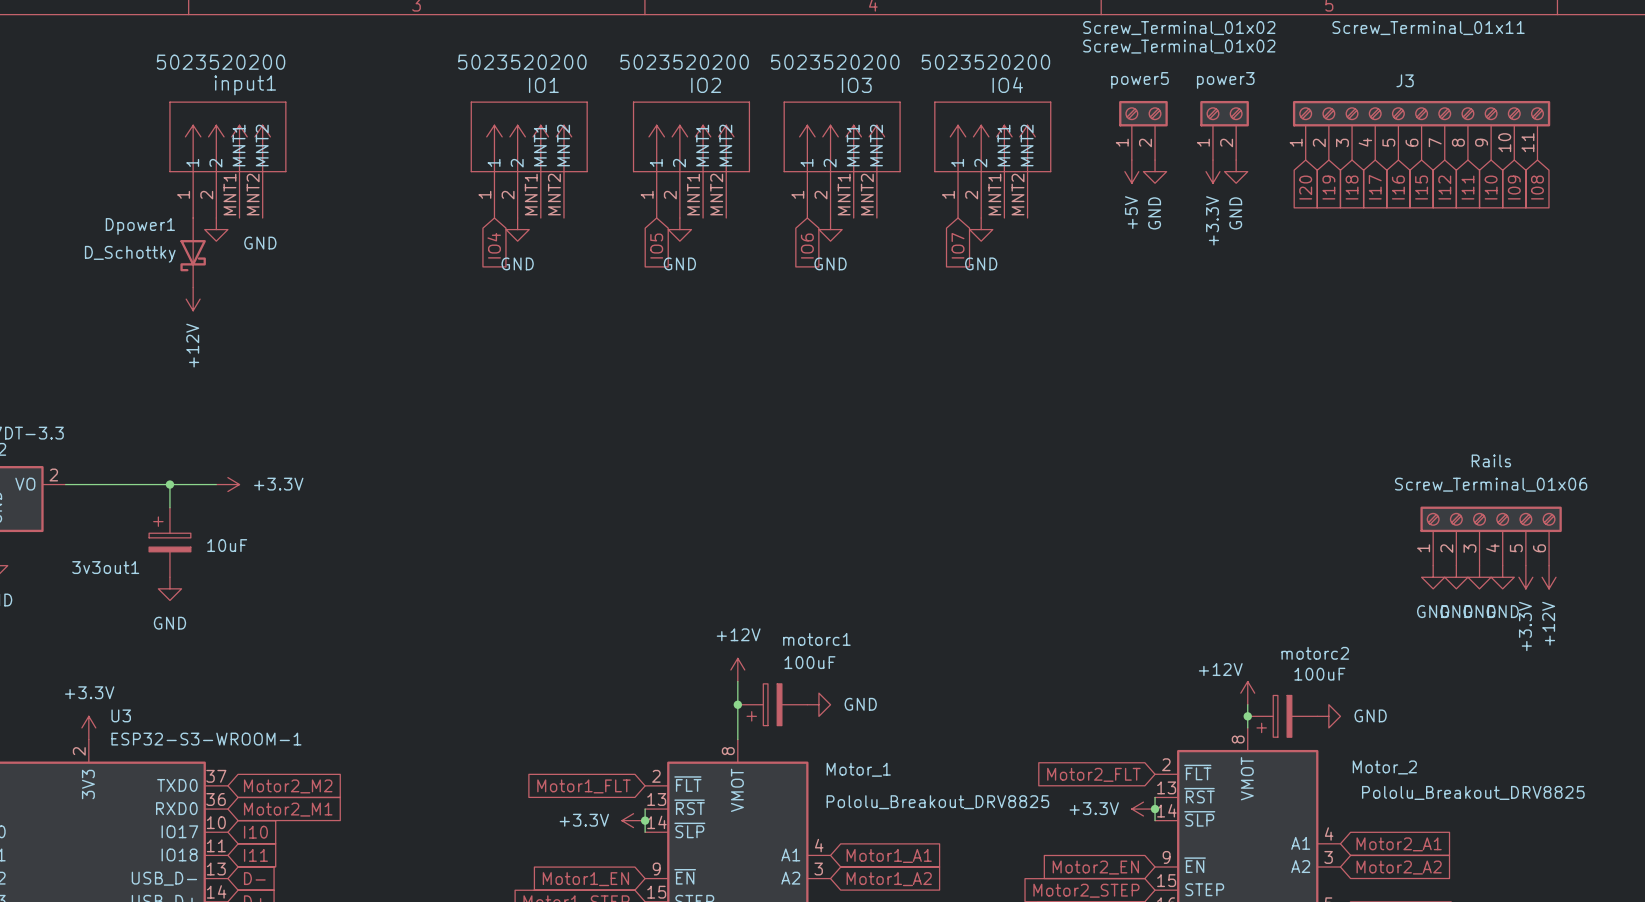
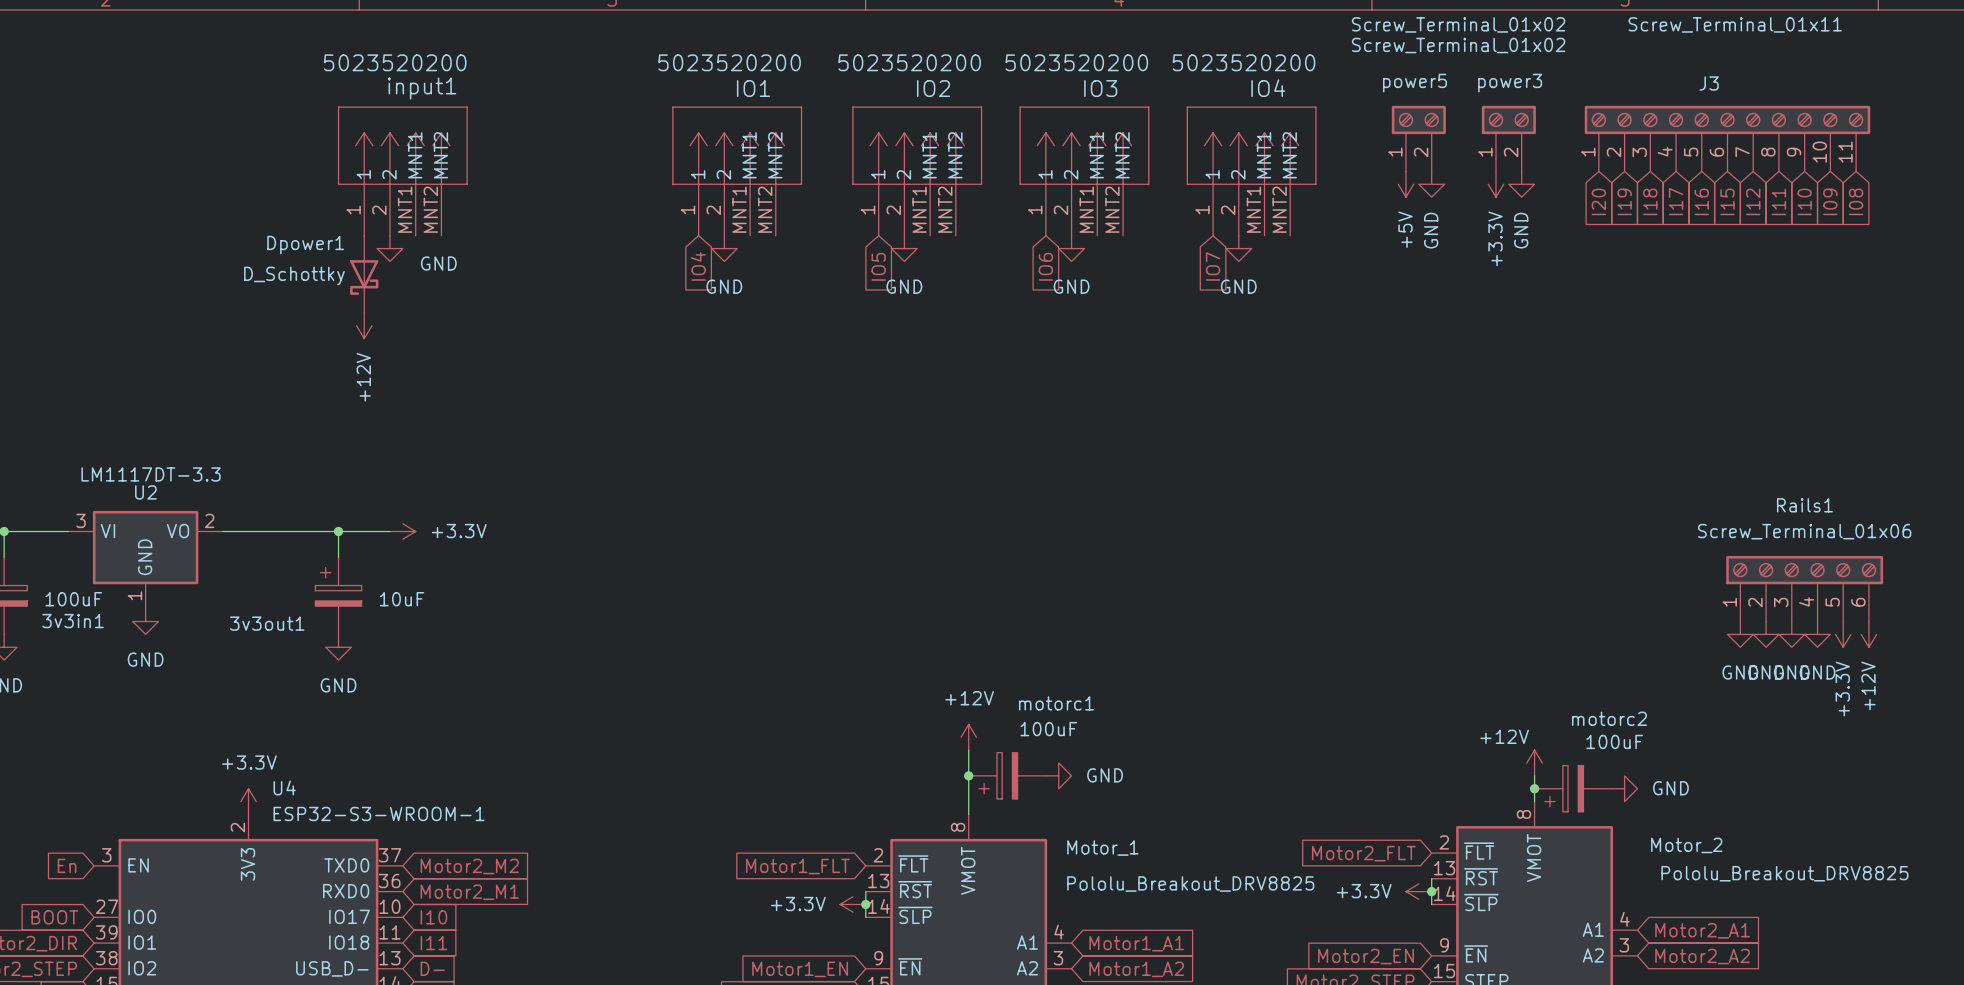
Rails name: Rails (1491, 460) -> Rails1 (1804, 505)
U3 name: U3 (121, 715) -> U4 (284, 787)

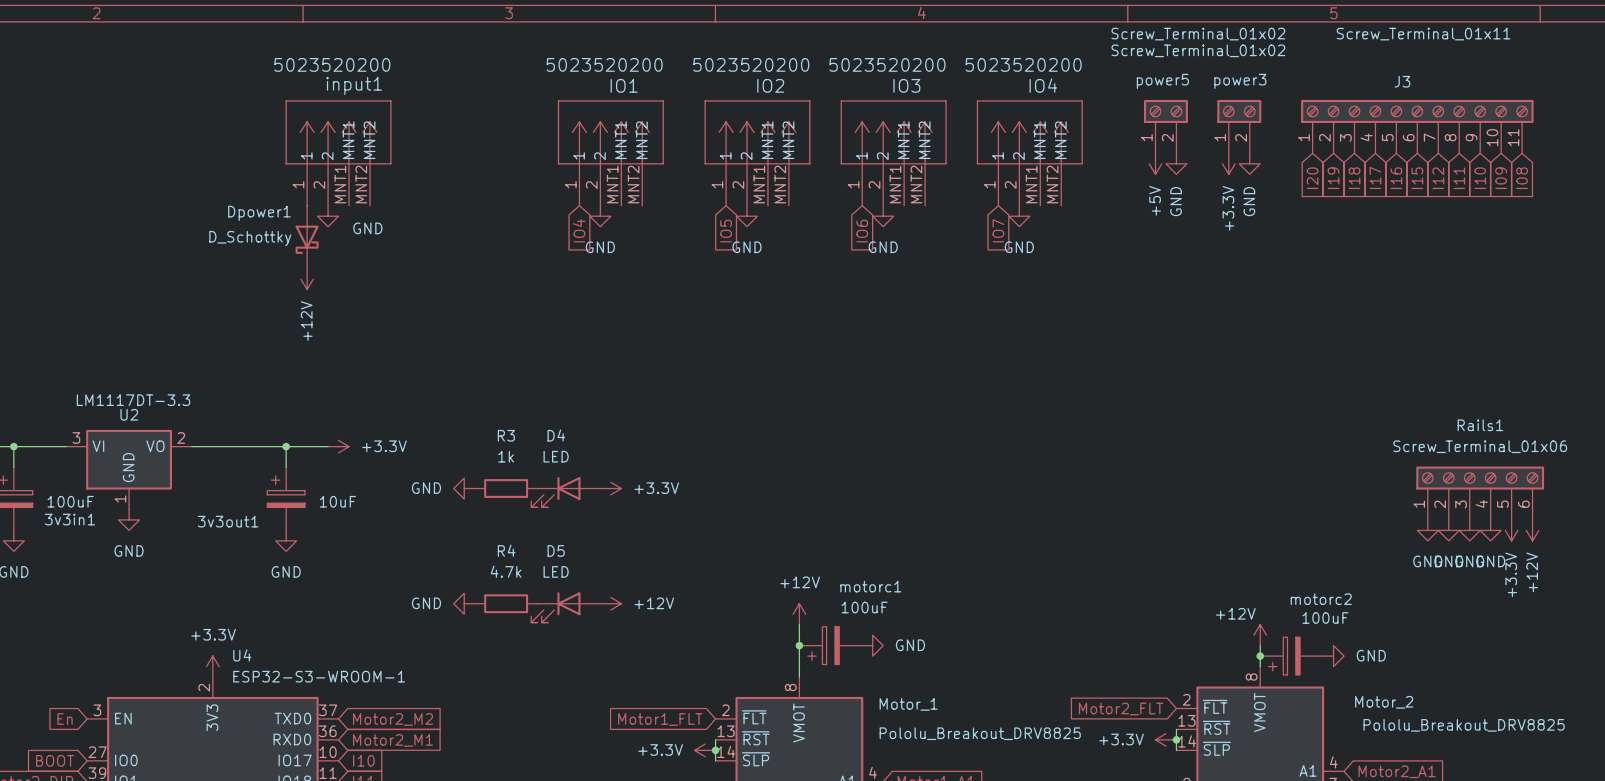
power symbol: none -> GND (464, 488)
R3: none -> 1k (506, 488)
power symbol: none -> +3.3V (610, 488)
D4: none -> LED (565, 492)
power symbol: none -> GND (464, 603)
R4: none -> 4.7k (506, 603)
power symbol: none -> +12V (610, 603)
D5: none -> LED (565, 607)

